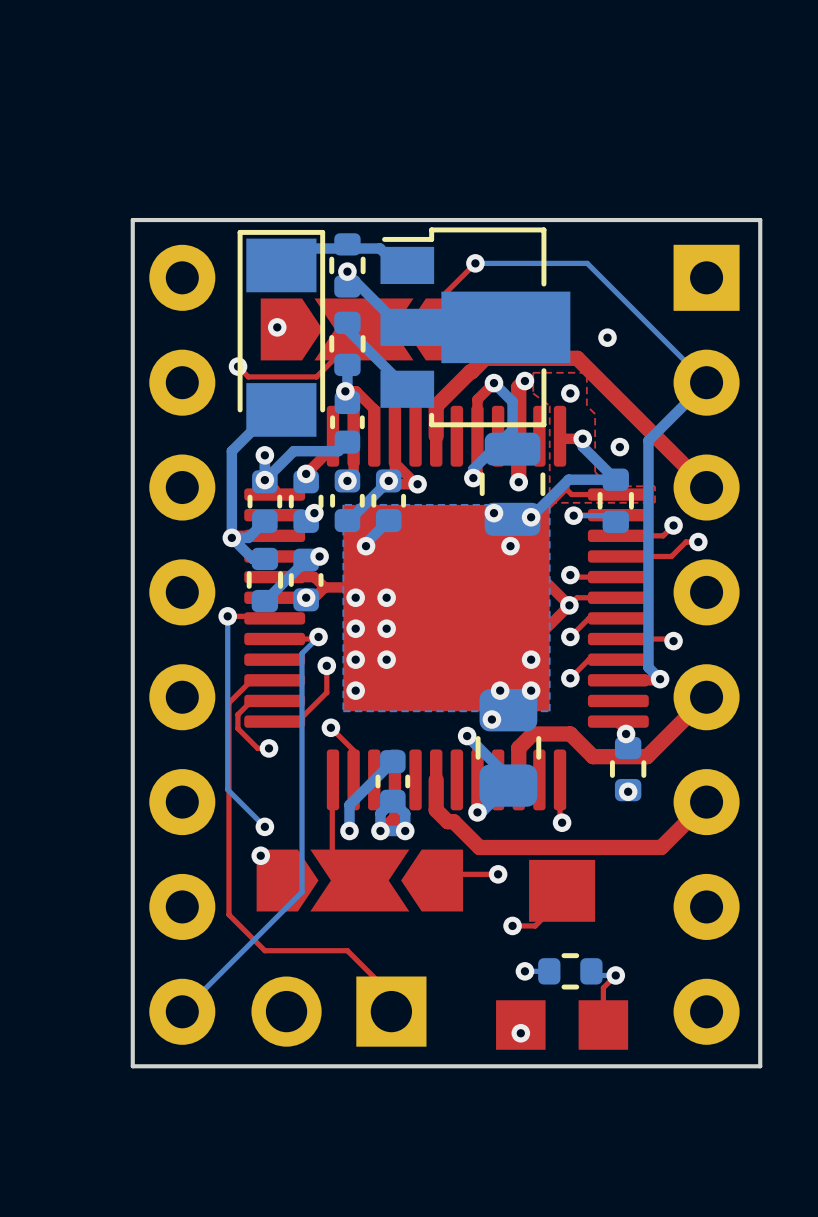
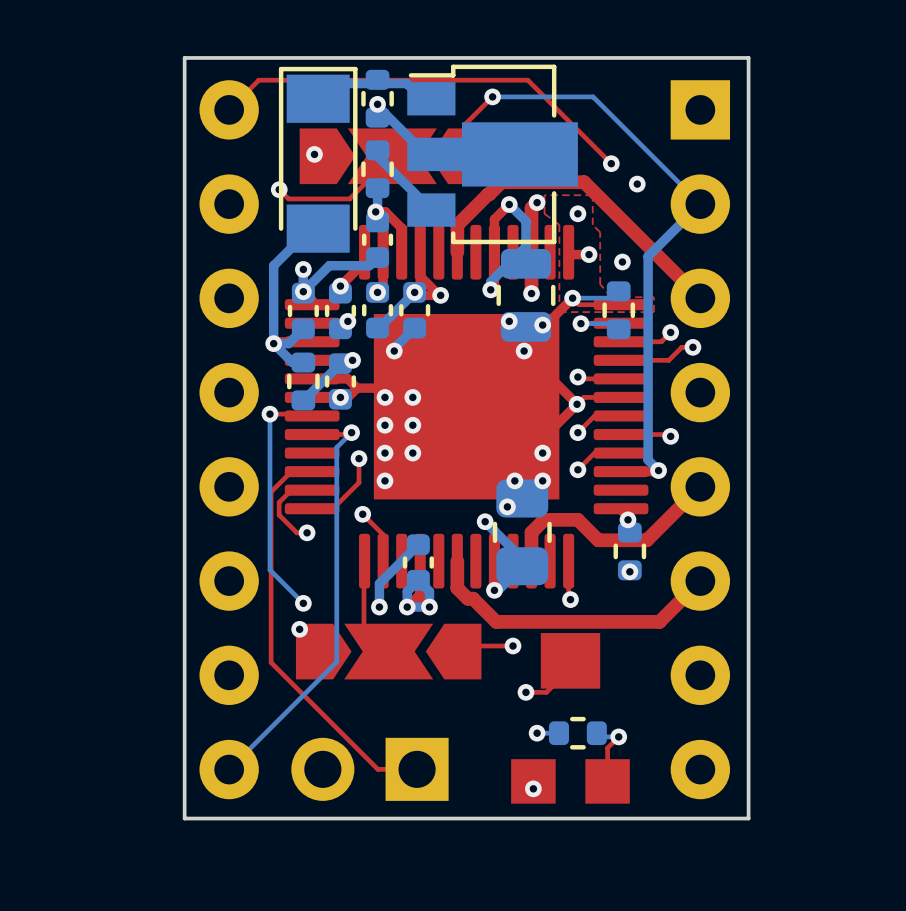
top track: none -> (229, 109) (258, 80) (527, 80) (611, 163)
via: none -> (637, 184)
bottom track: (582, 438) (582, 446) (615, 479) (568, 479) (531, 517) -> none
bottom track: none -> (618, 291) (611, 298) (572, 298)
via: none -> (572, 298)
bottom zone outline: (549, 504) (549, 711) (343, 711) (343, 504) (549, 504) -> none
top track: (228, 892) (228, 914) (264, 950) (347, 950) (391, 994) (391, 1011) -> (271, 662) (377, 769) (417, 769)

